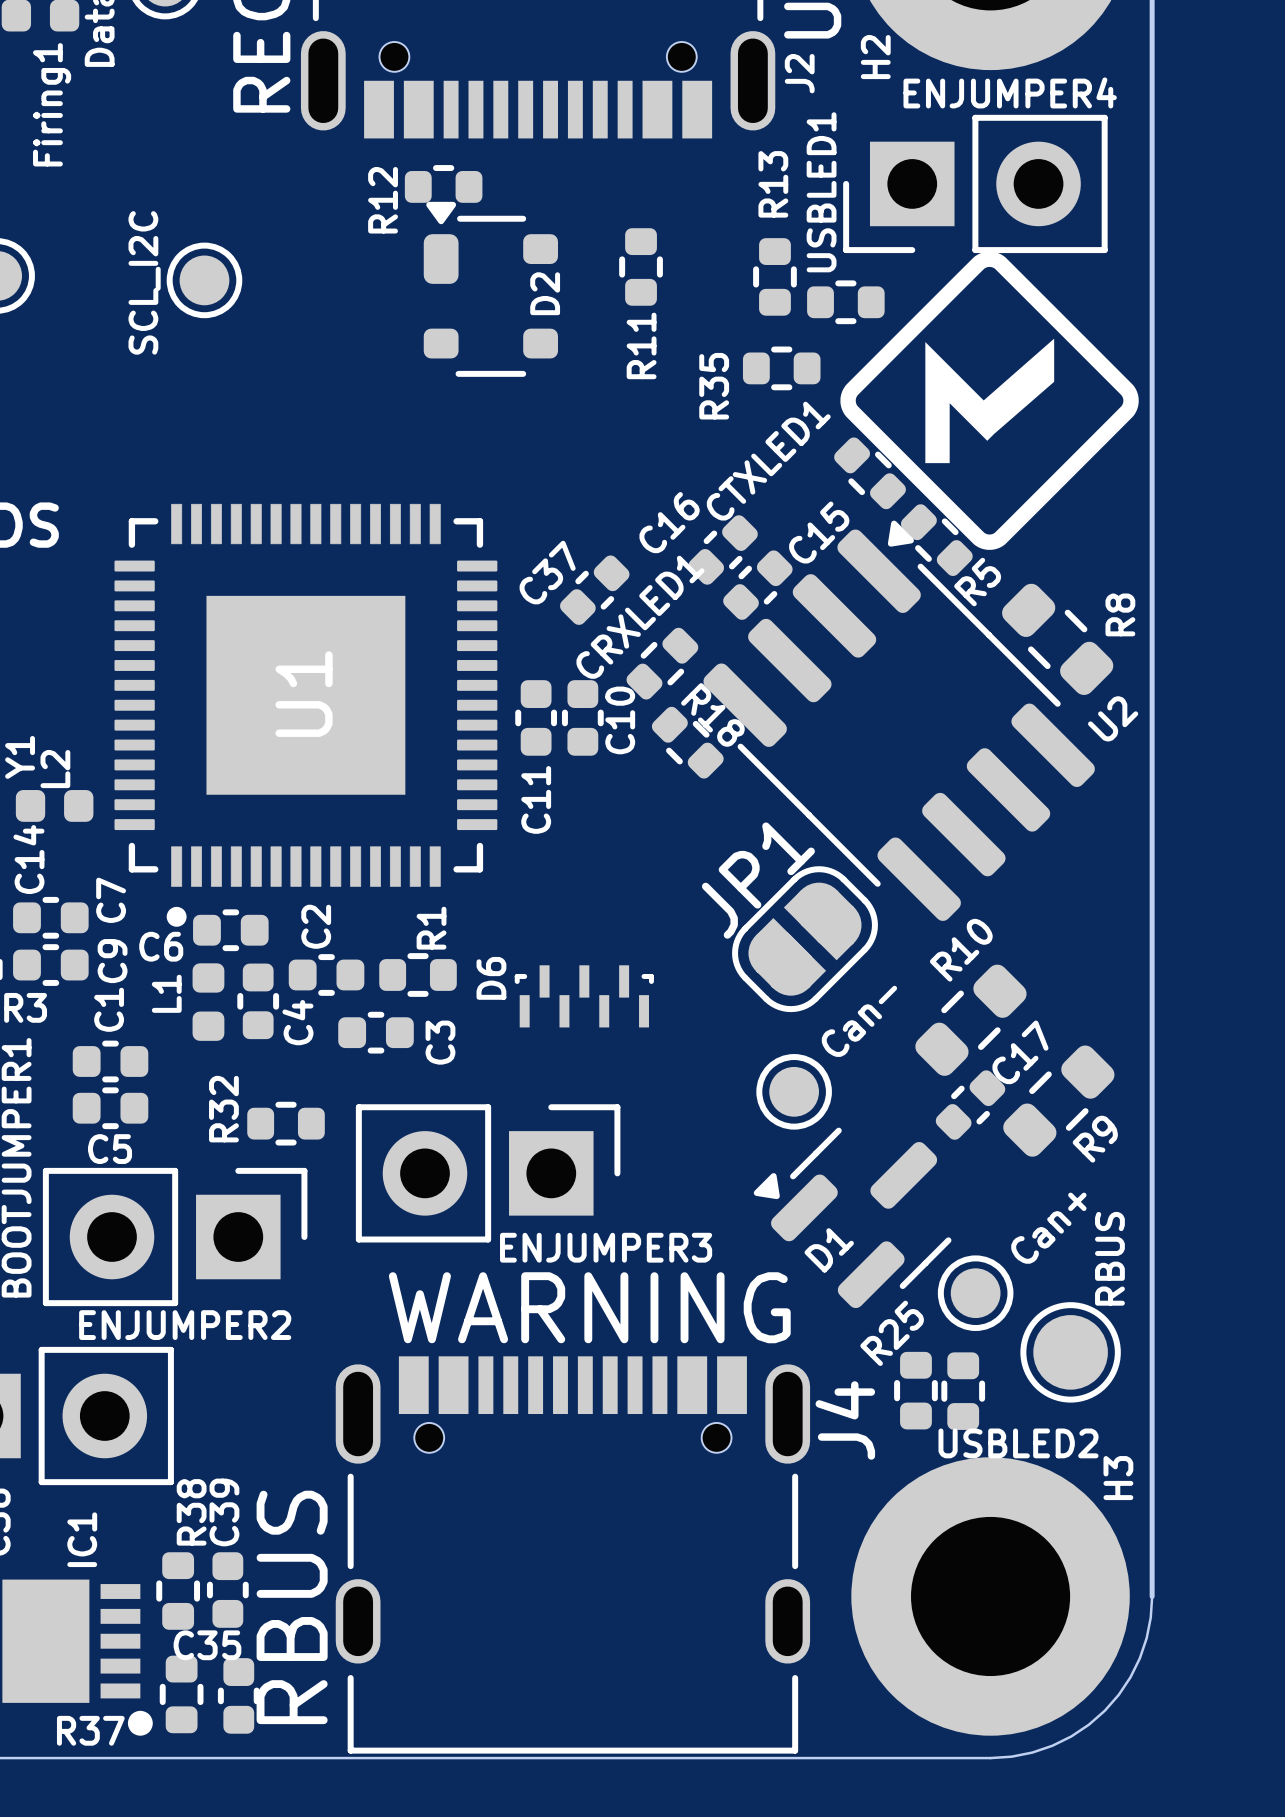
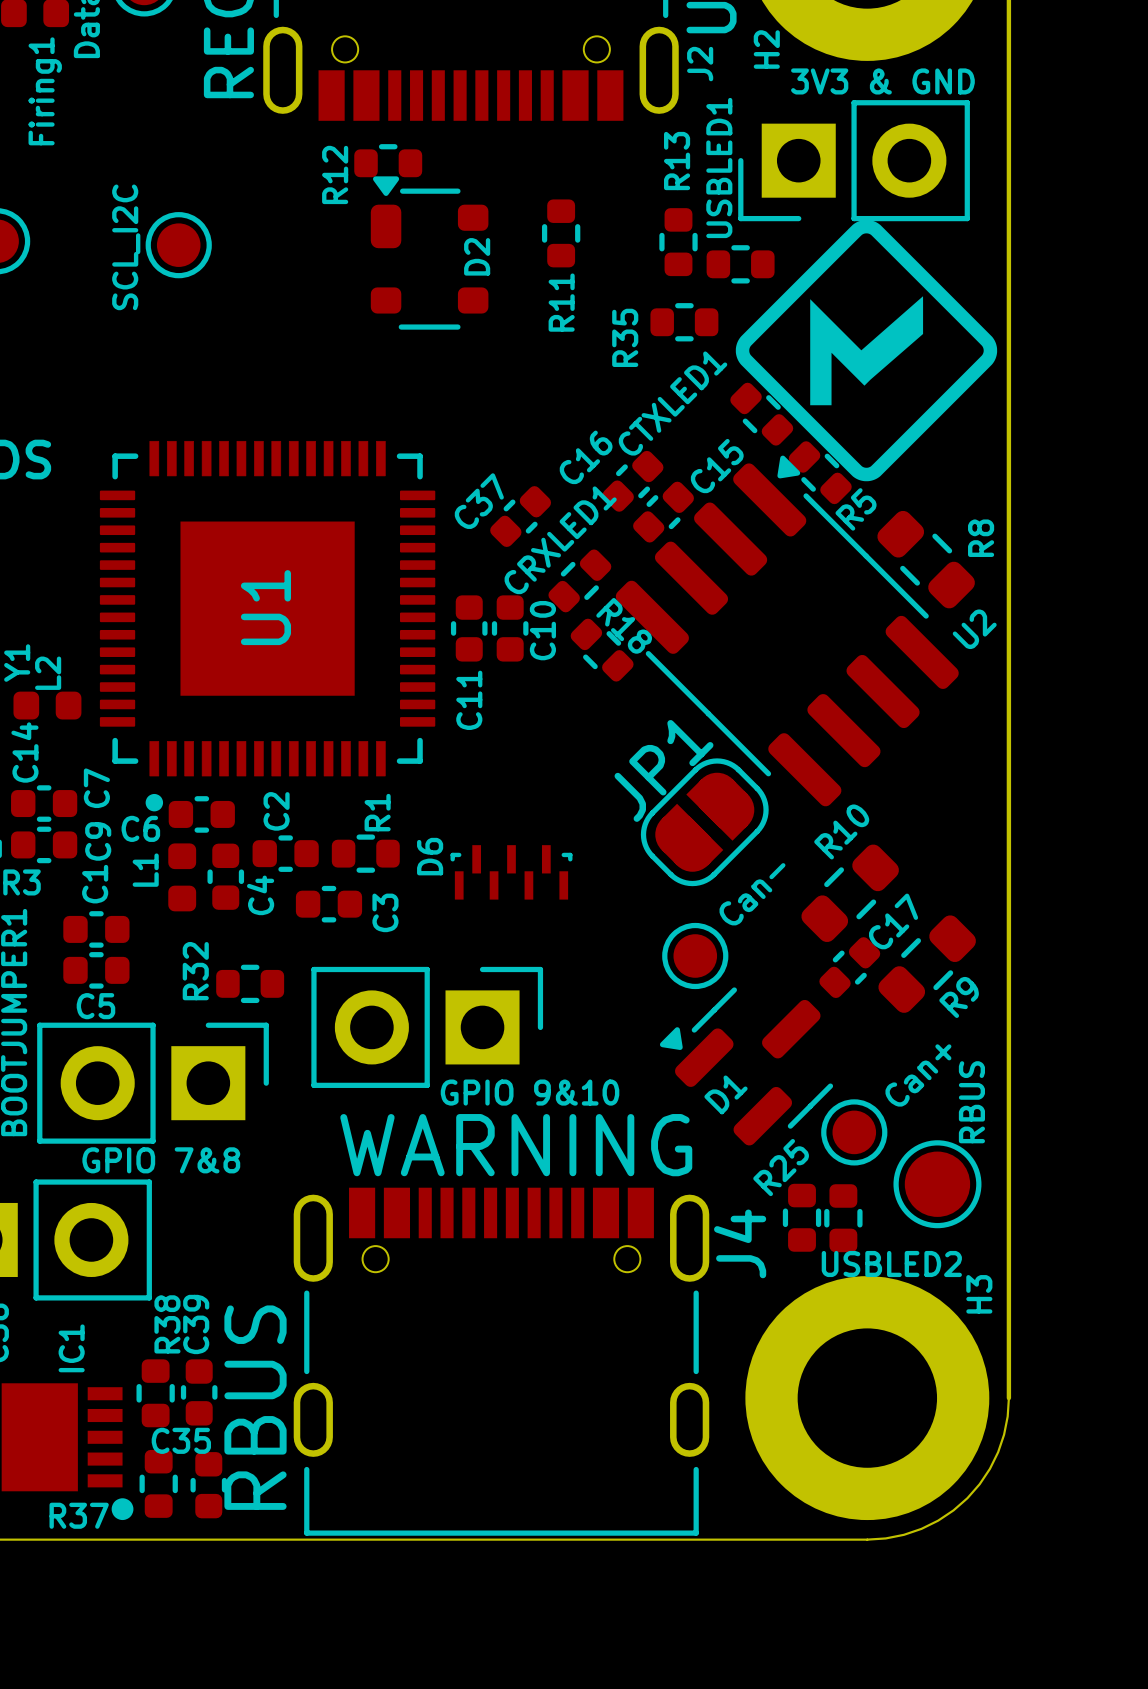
ENJUMPER4 name: ENJUMPER4 (1010, 92) -> 3V3 & GND (882, 81)
ENJUMPER3 name: ENJUMPER3 (606, 1247) -> GPIO 9&10 (530, 1092)
ENJUMPER2 name: ENJUMPER2 (185, 1325) -> GPIO 7&8 (161, 1160)

